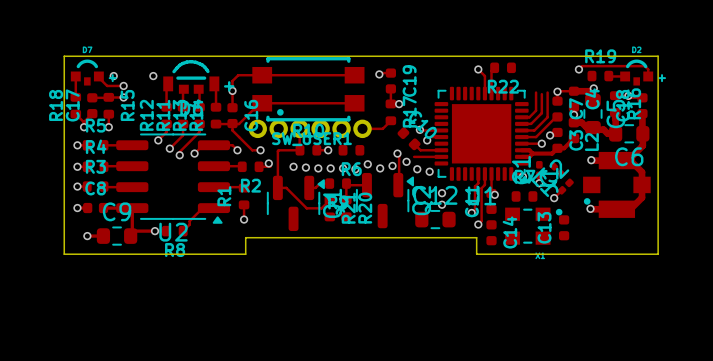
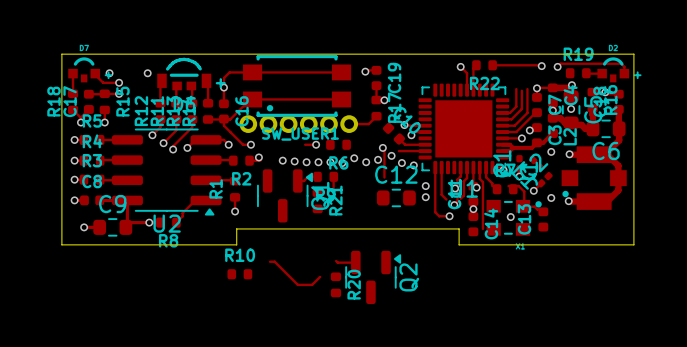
track: none -> (492, 65) (541, 66)
via: none -> (541, 66)
via: none -> (571, 109)
track: (299, 128) (299, 150) (277, 151) (277, 187) (286, 187) (306, 208) (321, 208) (329, 200) -> none
R10 position: (308, 150) -> (239, 274)
via: none -> (551, 151)
track: none -> (435, 167) (435, 212) (439, 216) (449, 216)
track: none -> (441, 167) (441, 194) (446, 199)
track: none -> (479, 167) (479, 178) (482, 182) (482, 228)
track: none -> (486, 167) (486, 177) (492, 186)
track: (346, 183) (348, 185) (366, 185) -> (336, 261) (355, 262)
track: none -> (508, 186) (518, 186) (524, 191) (525, 206) (544, 209)
via: none -> (455, 188)
Q2 position: (384, 200) -> (373, 277)
track: (481, 203) (481, 221) (478, 224) -> (463, 195) (460, 198)
via: none -> (551, 197)
R20 position: (346, 208) -> (335, 284)
via: none -> (473, 209)
C12 position: (435, 219) -> (396, 197)
via: none -> (449, 216)
via: (478, 224) -> none
via: none -> (510, 217)
track: none -> (270, 261) (274, 261) (297, 284) (312, 284) (320, 276)

